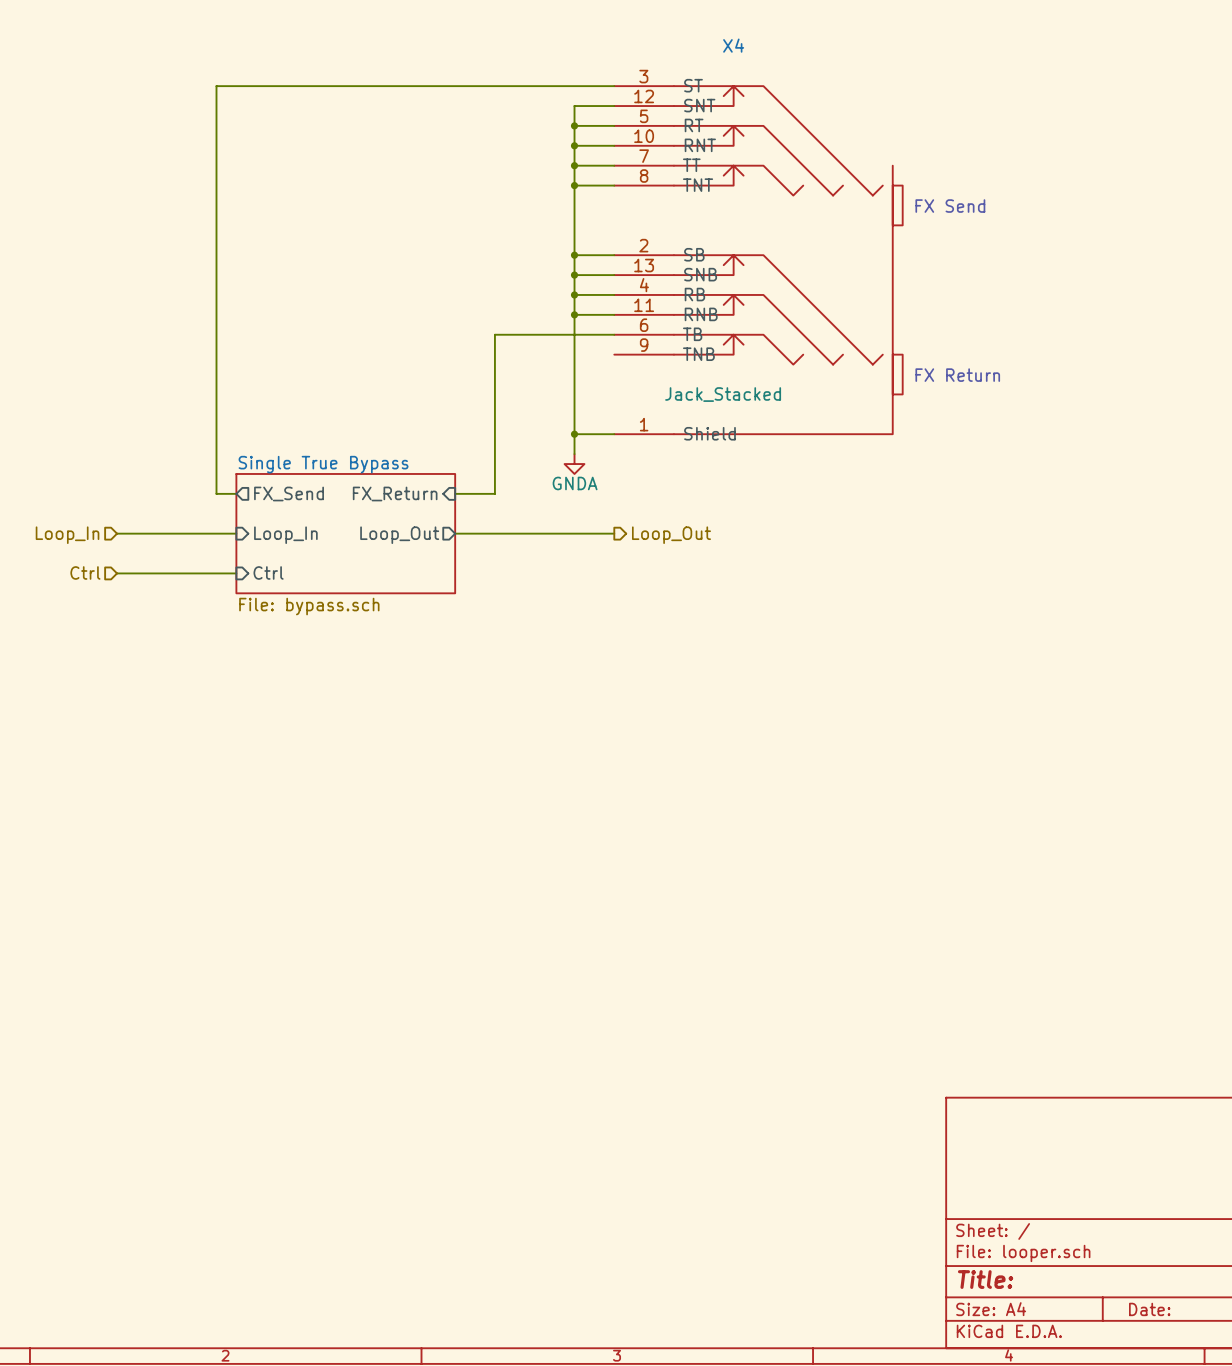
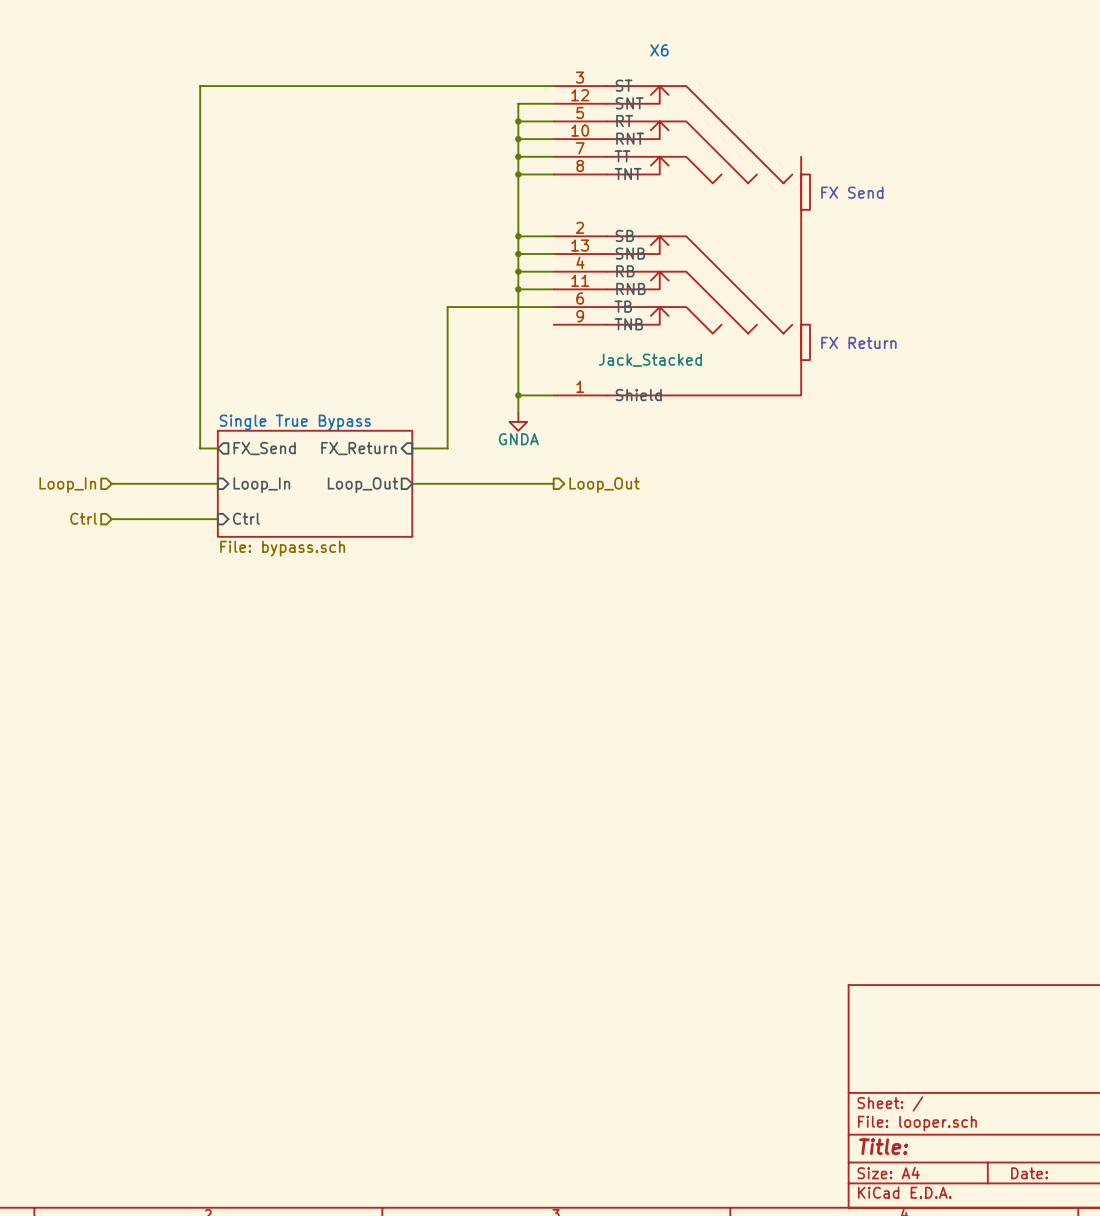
X4 name: X4 (733, 45) -> X6 (659, 50)

